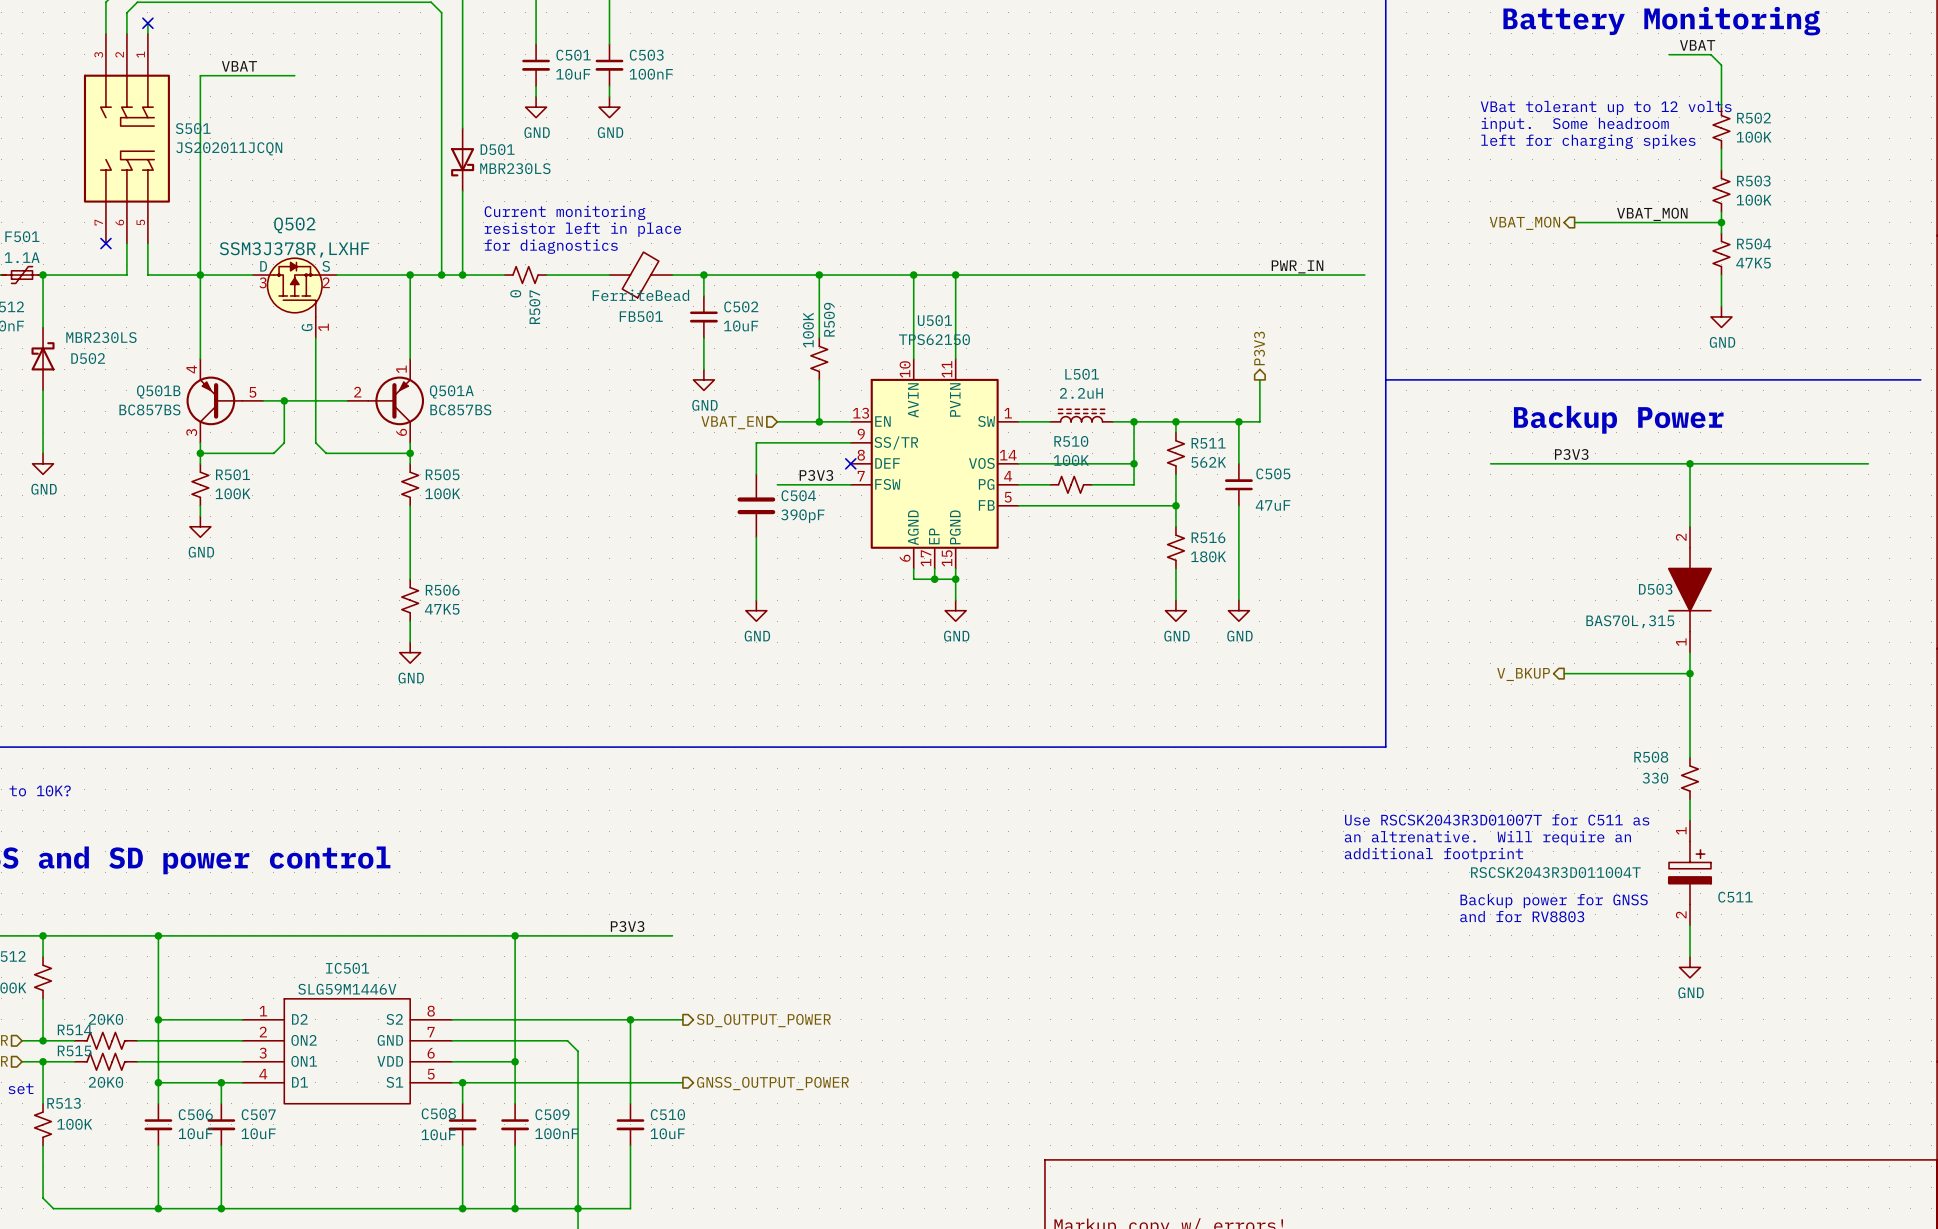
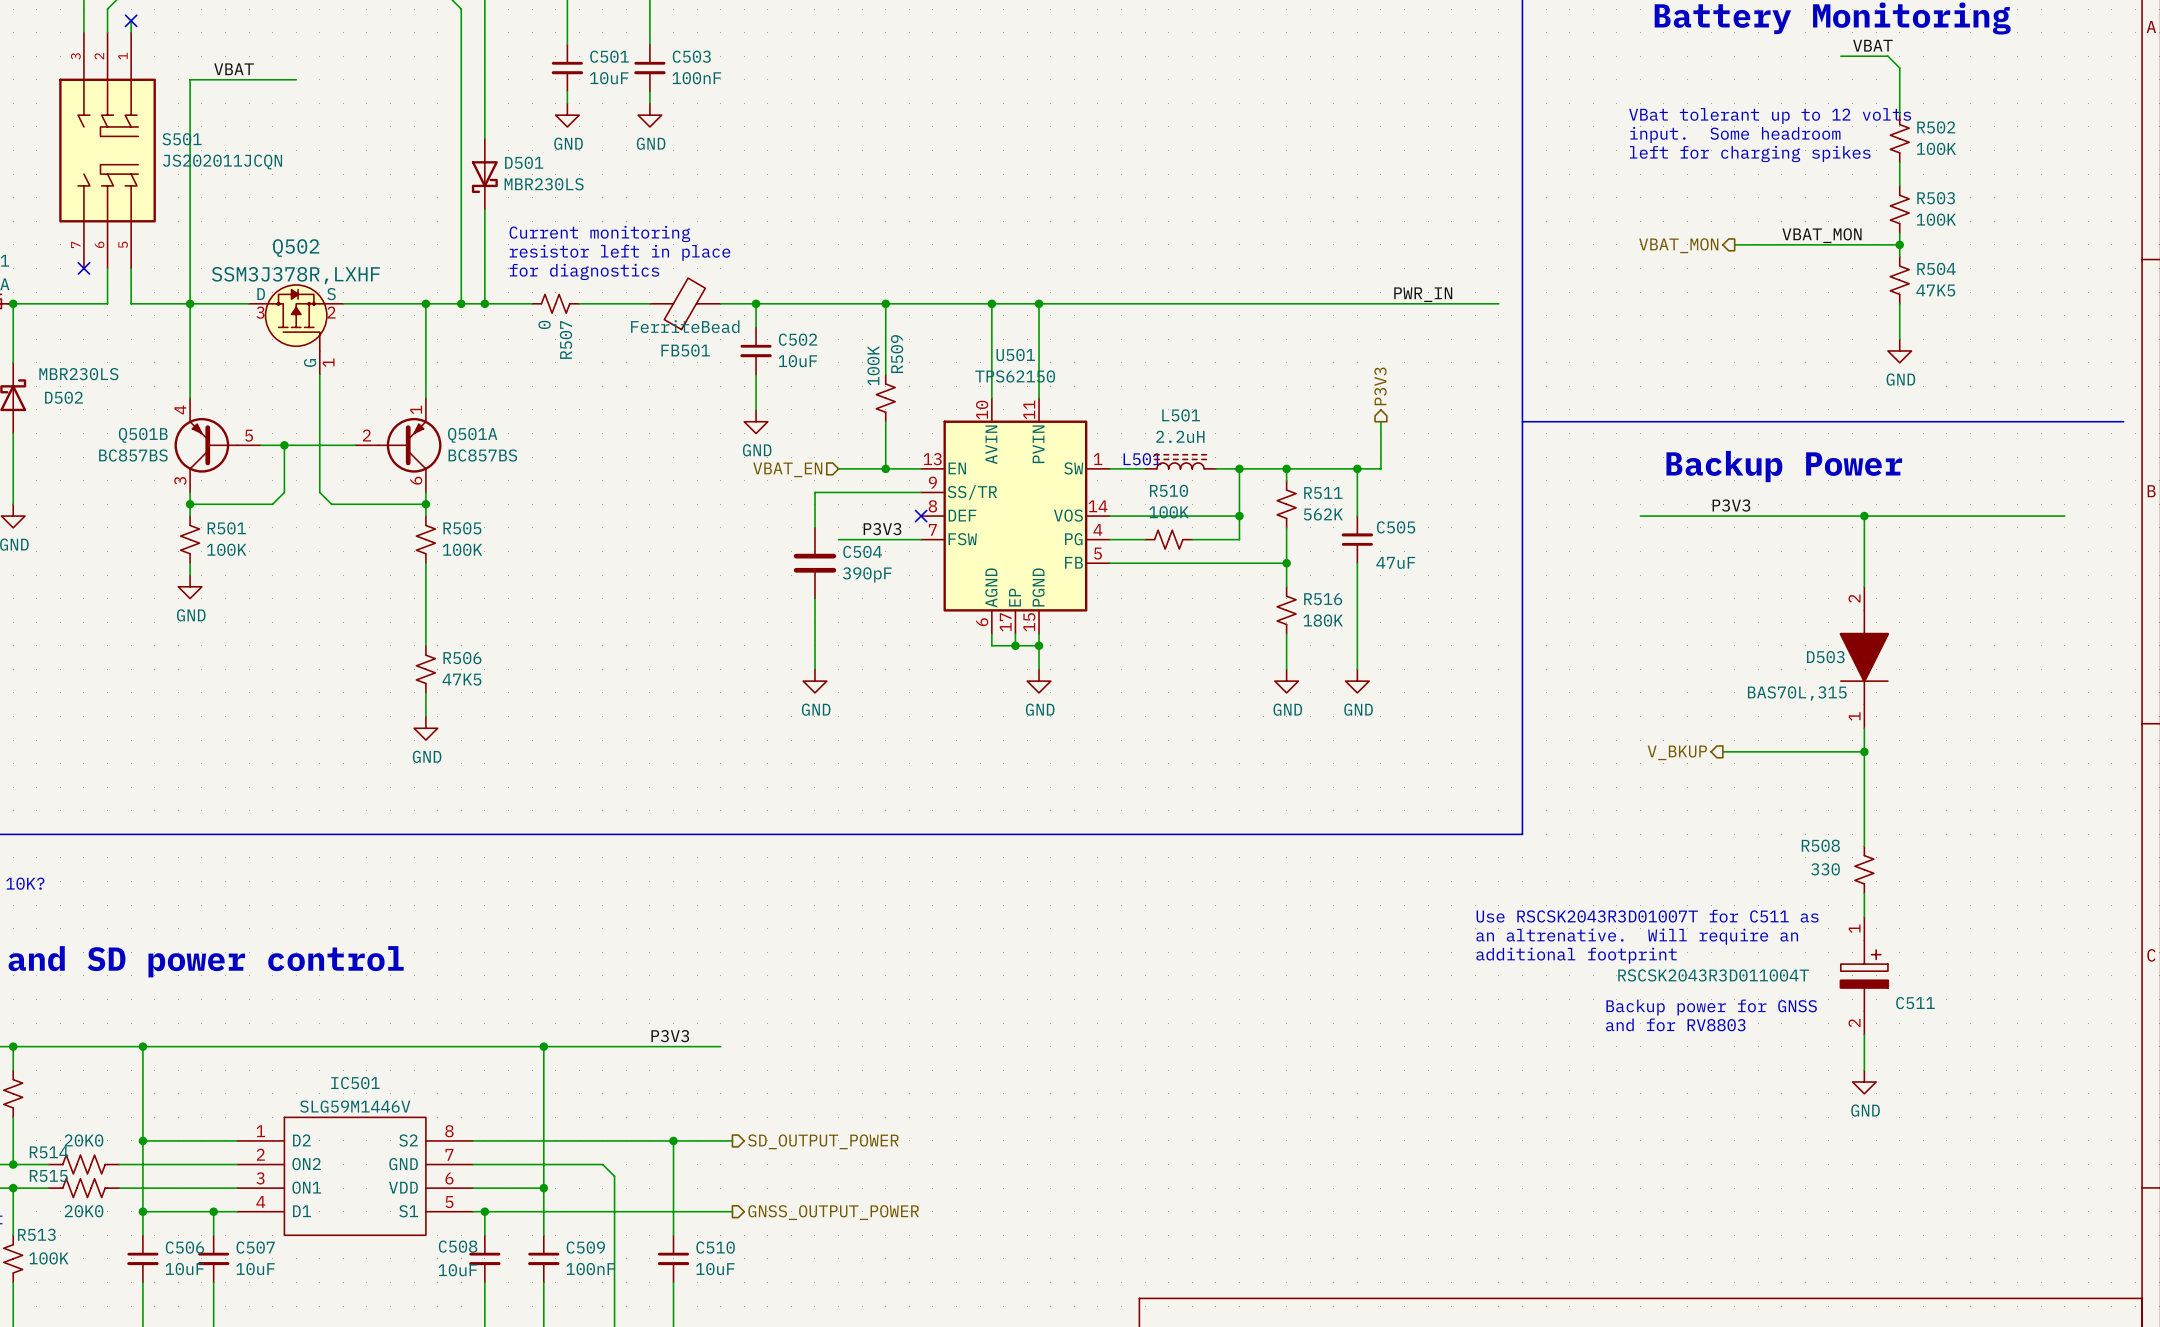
text: none -> L501 (1142, 459)

